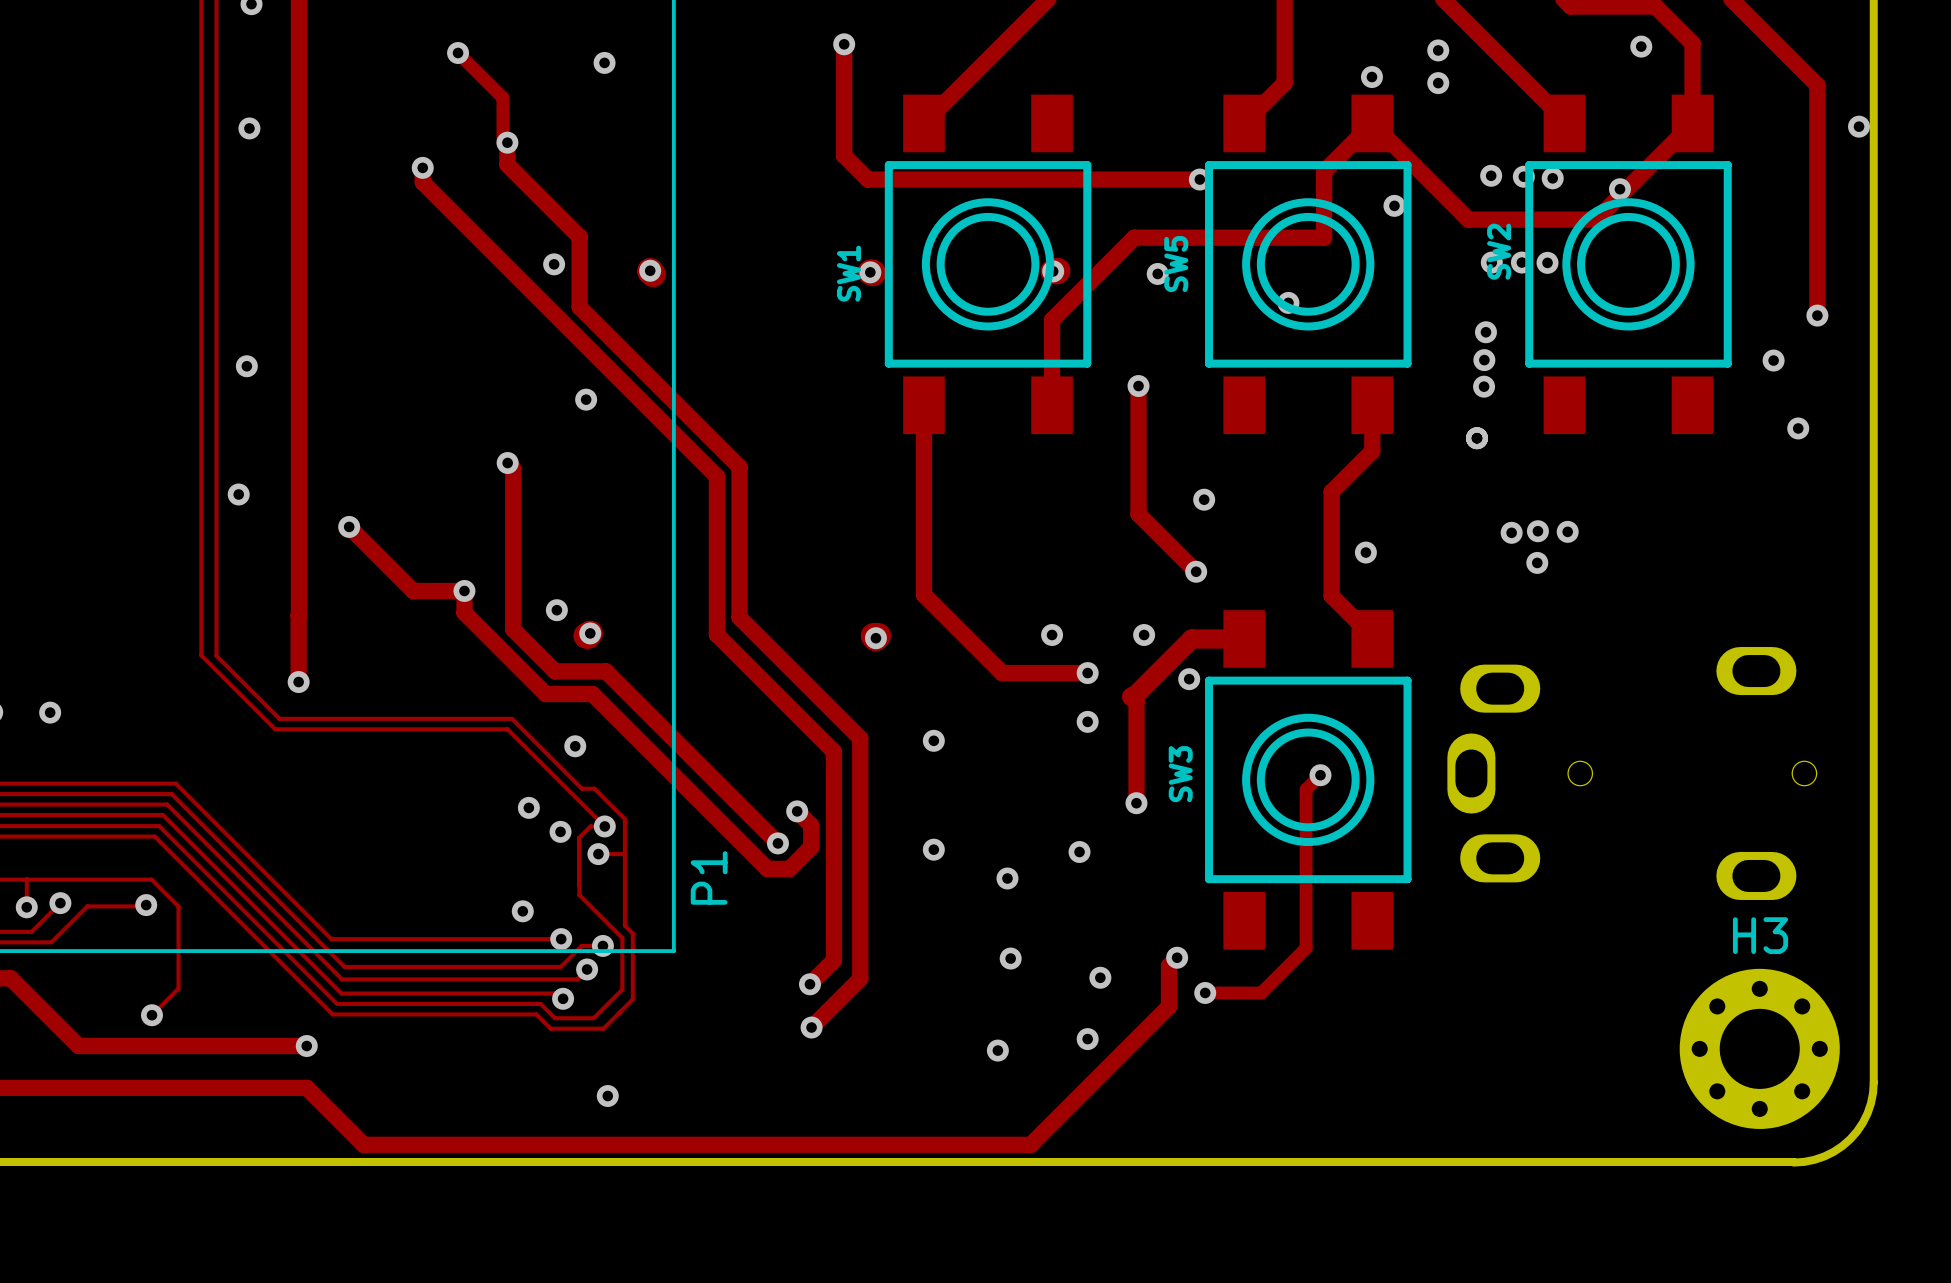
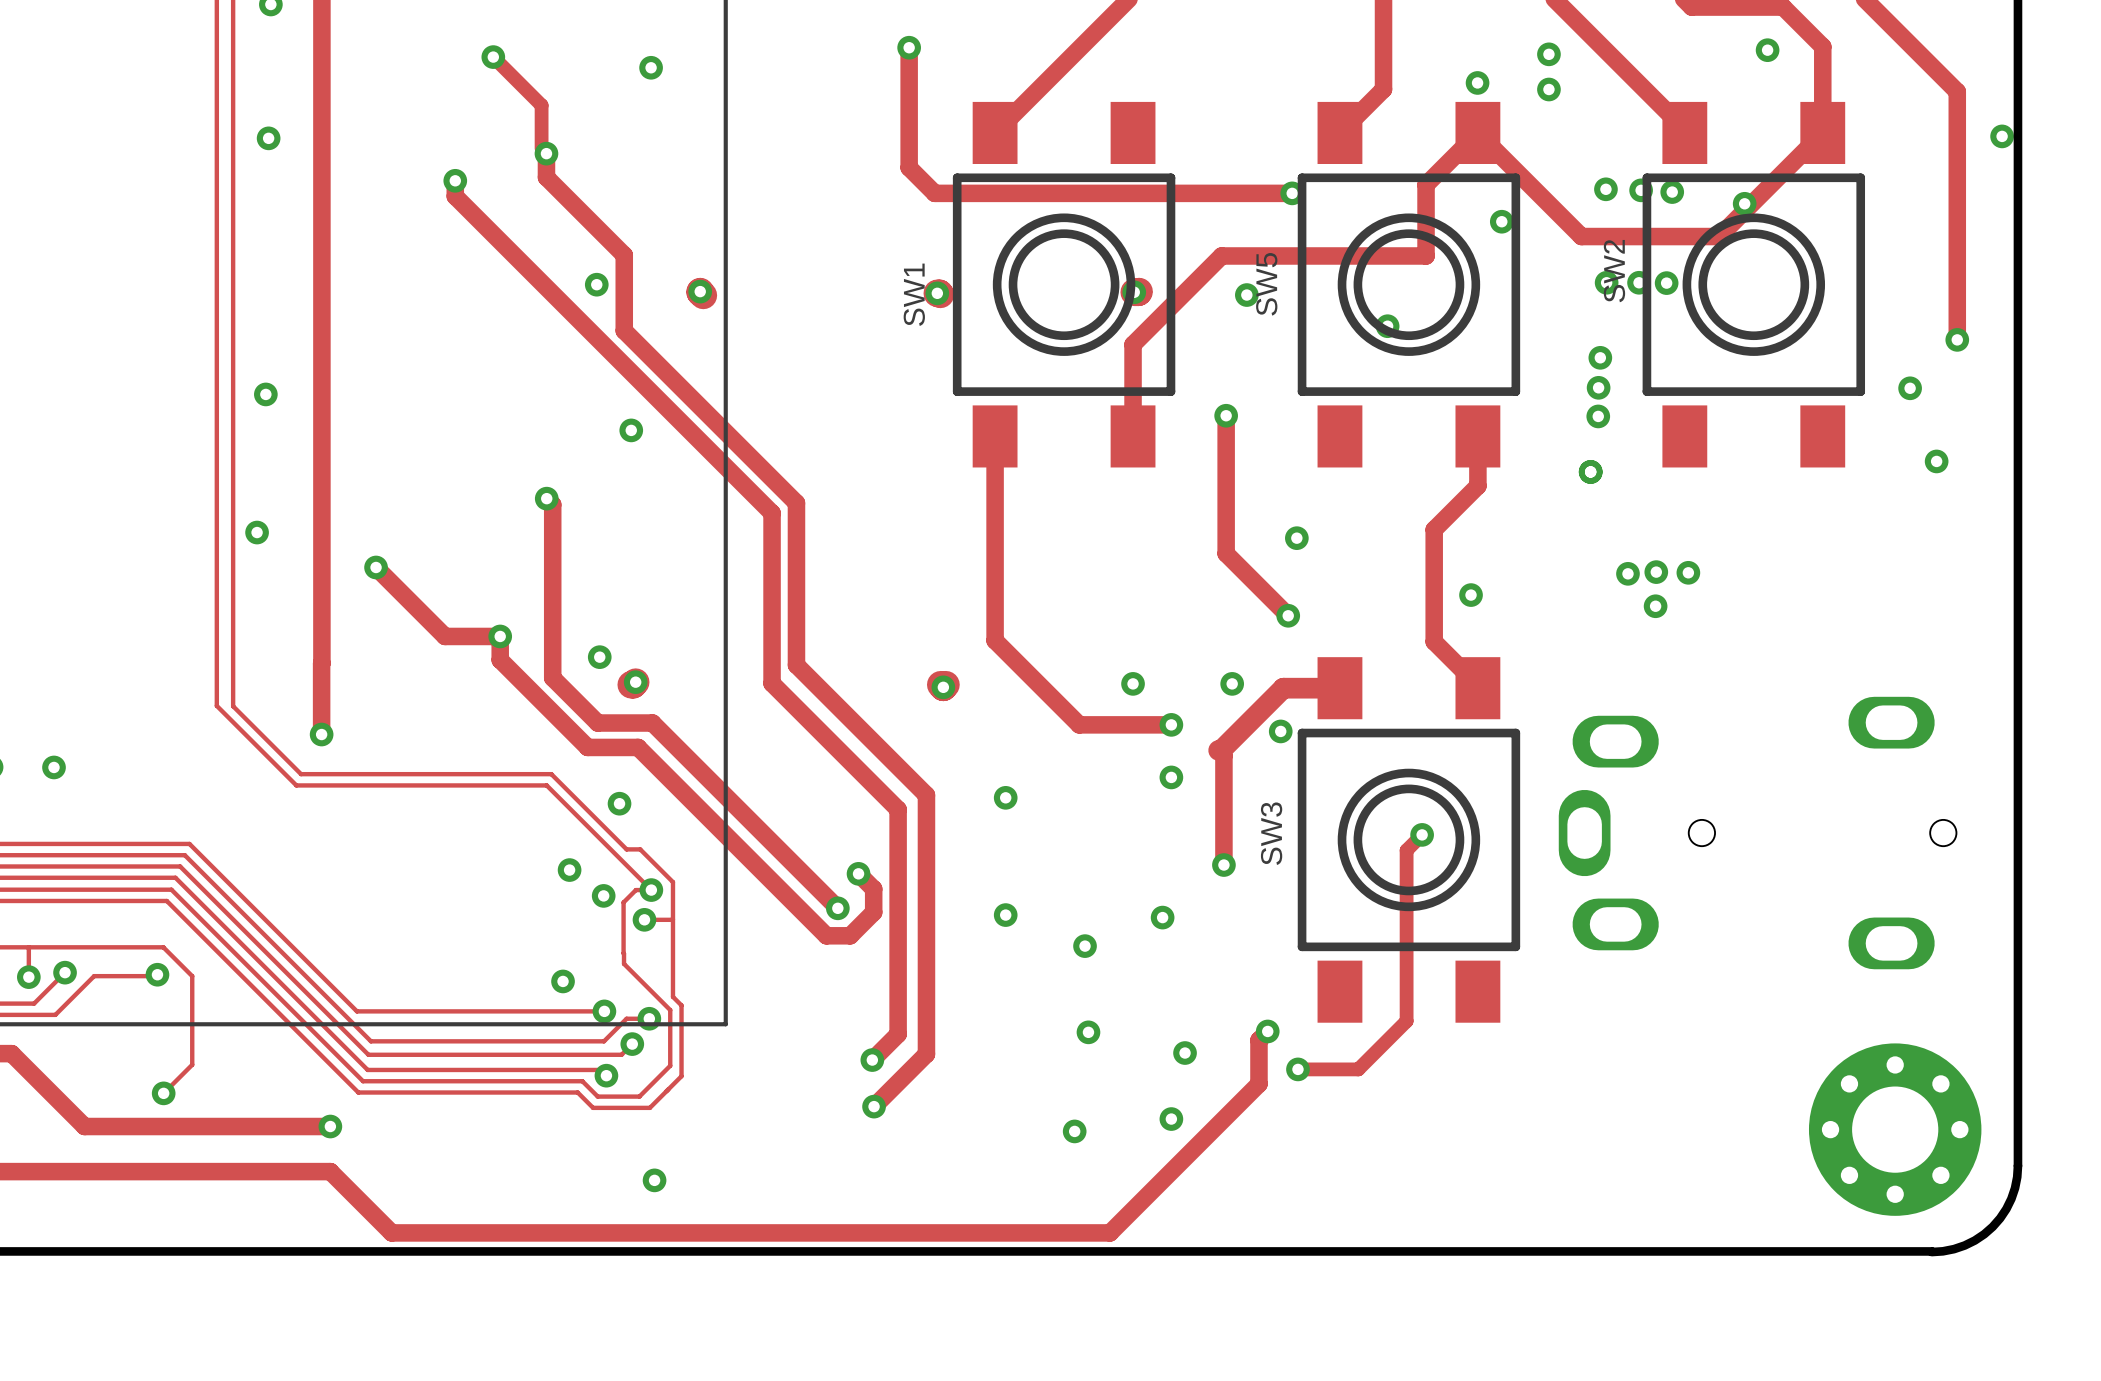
P1 name: P1 (709, 877) -> none
H3 name: H3 (1760, 935) -> none

